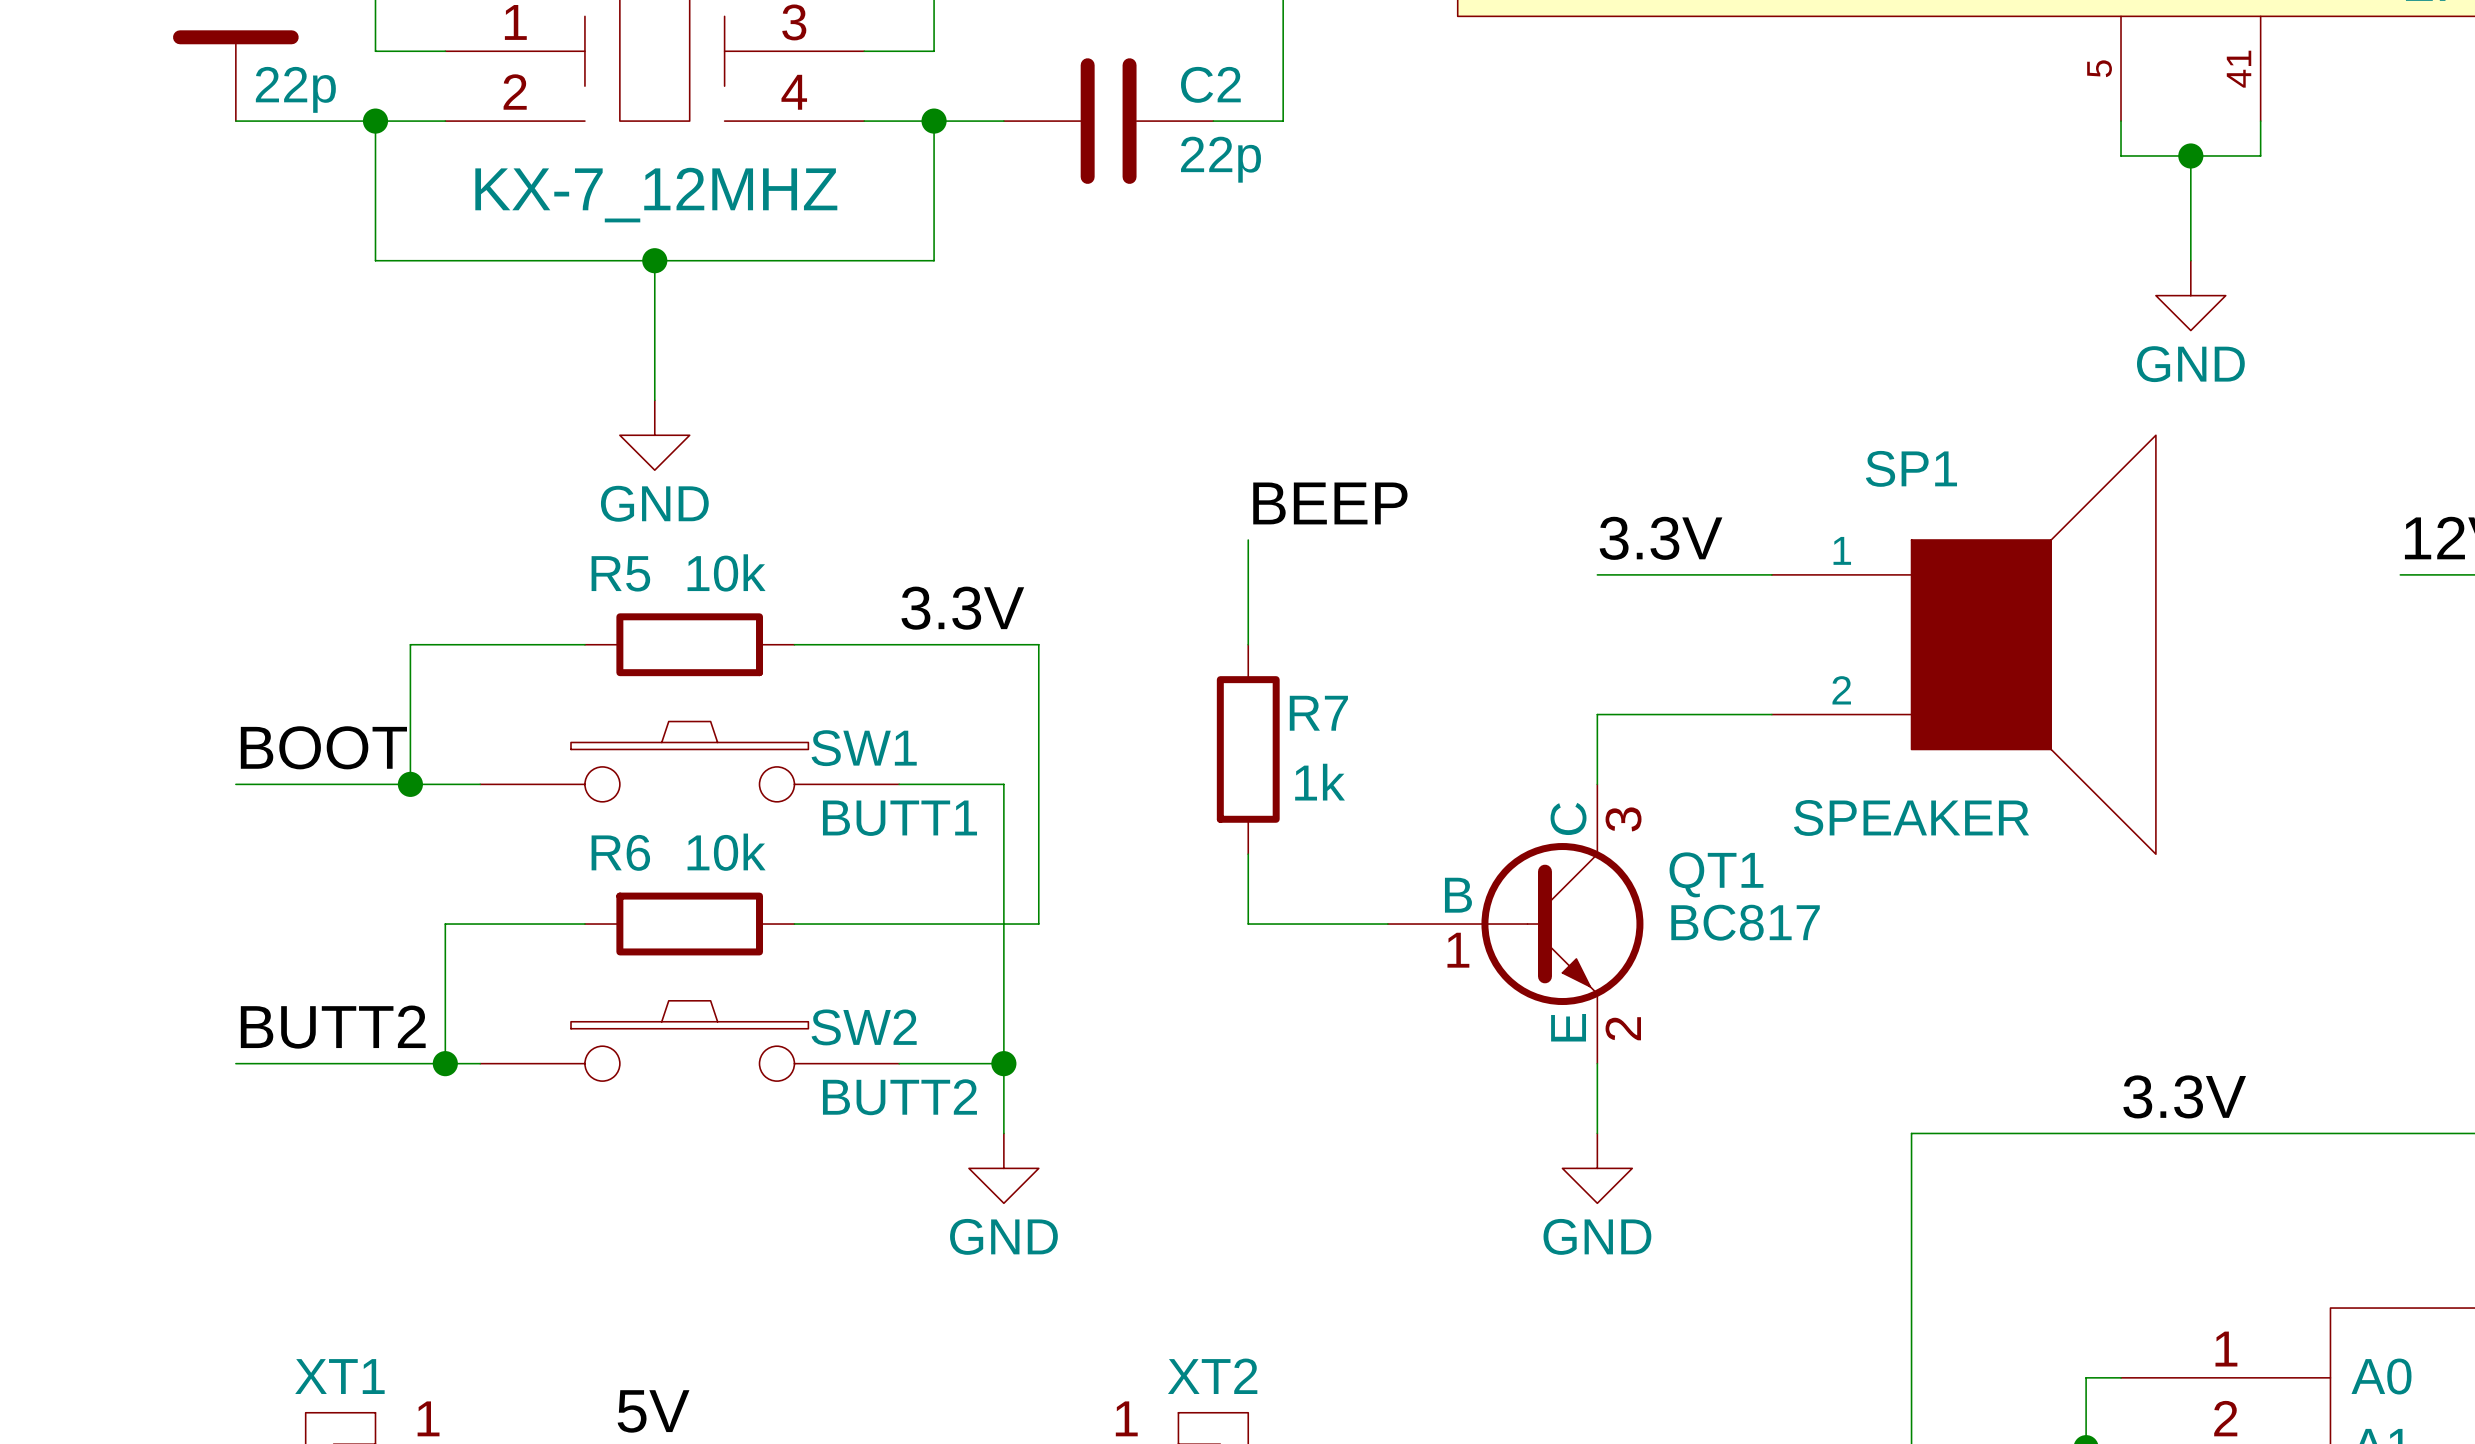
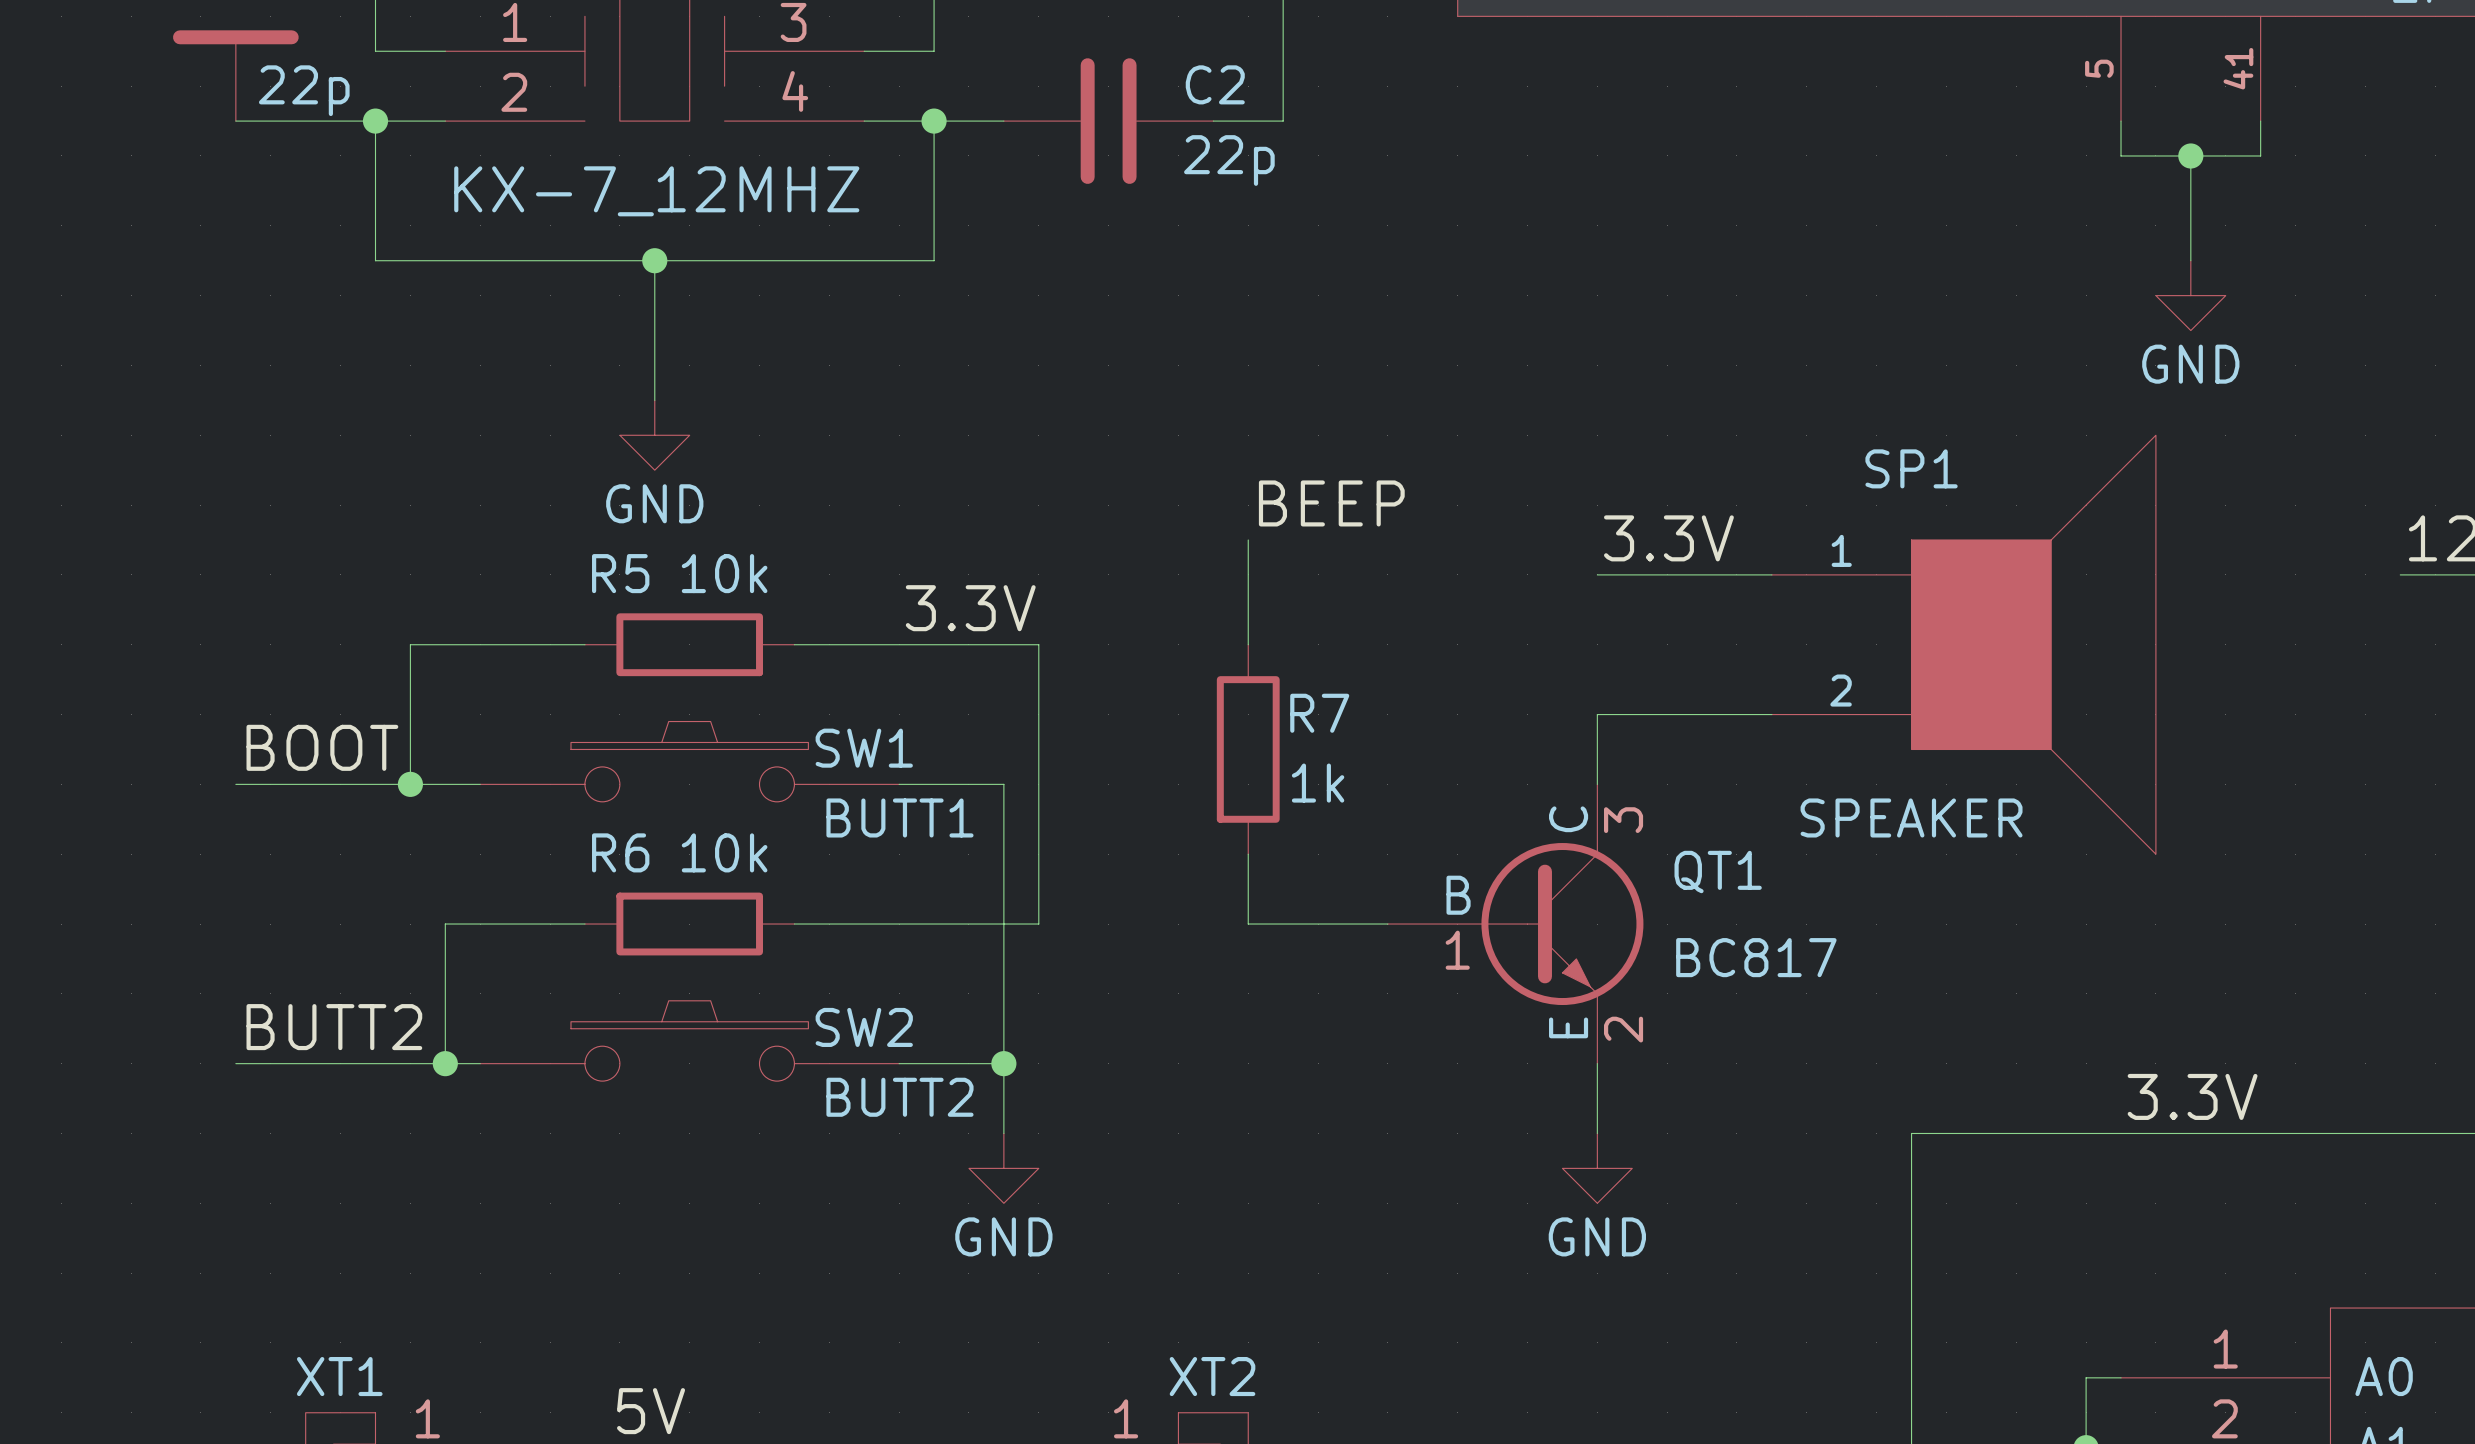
QT1 value position: BC817 (1745, 922) -> BC817 (1756, 957)

